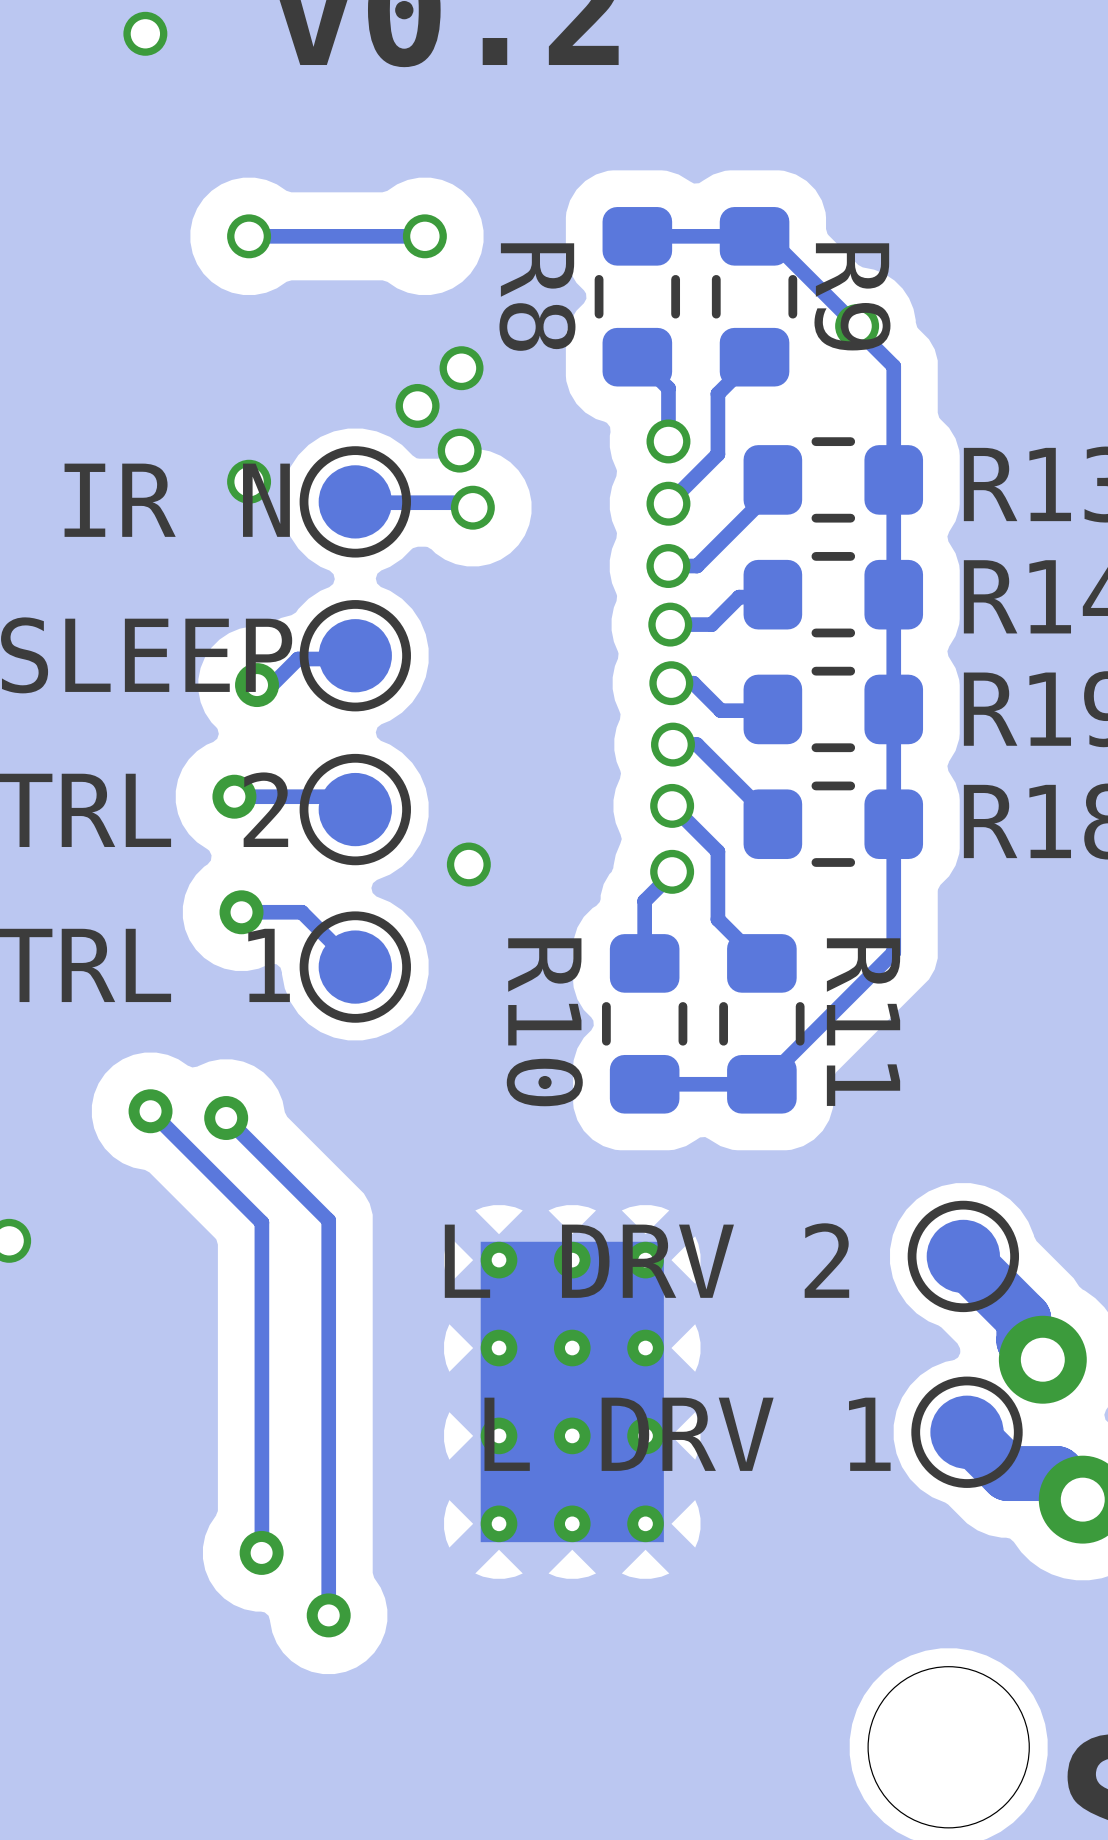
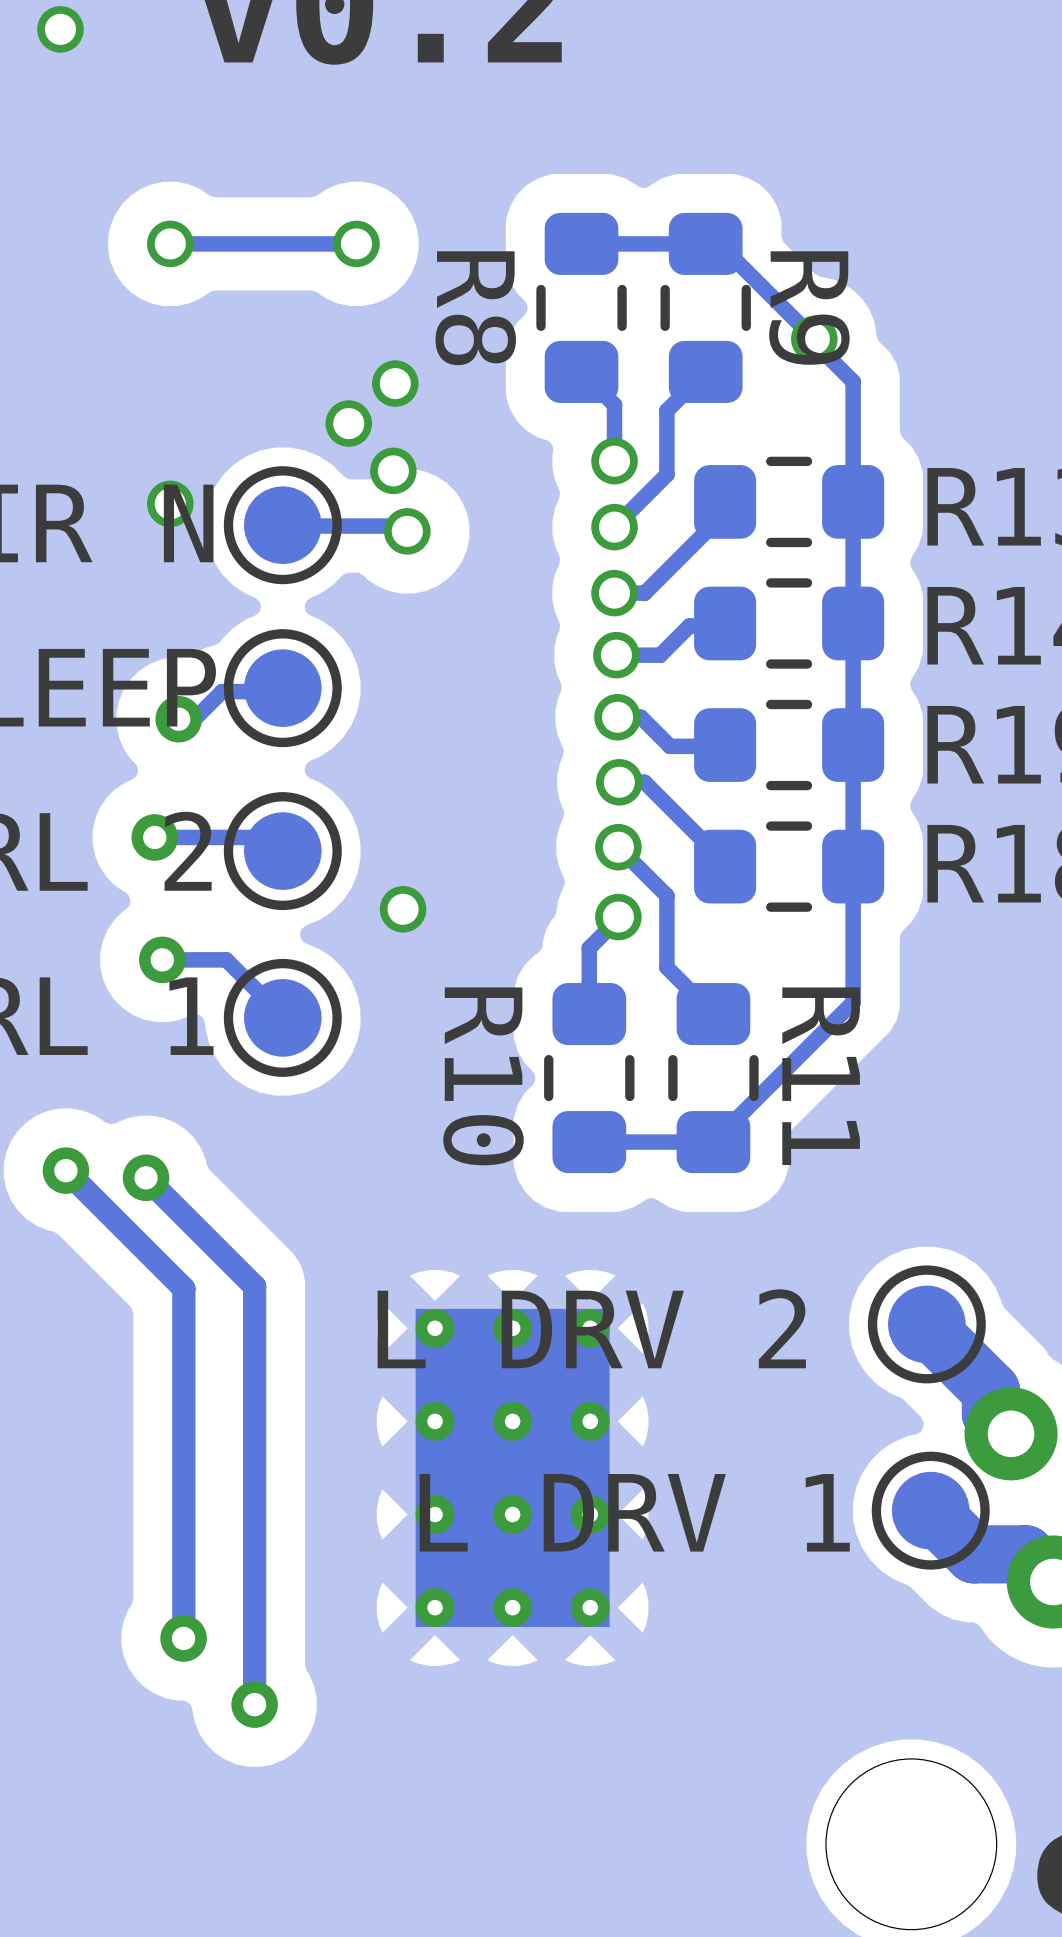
track width: thin (150, 1111) (261, 1222) (261, 1552) -> thick (65, 1170) (183, 1288) (183, 1638)
track width: thin (226, 1118) (328, 1220) (328, 1615) -> thick (146, 1177) (254, 1286) (254, 1704)

